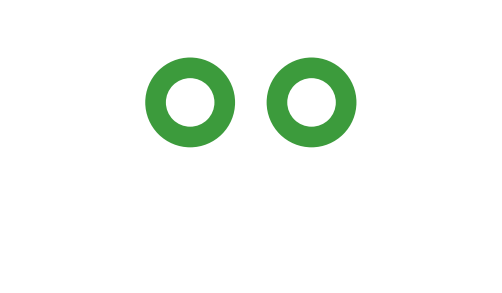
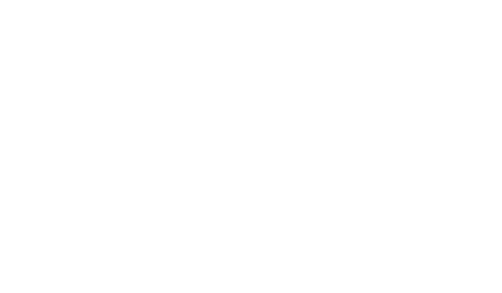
part: (250, 102) -> none

